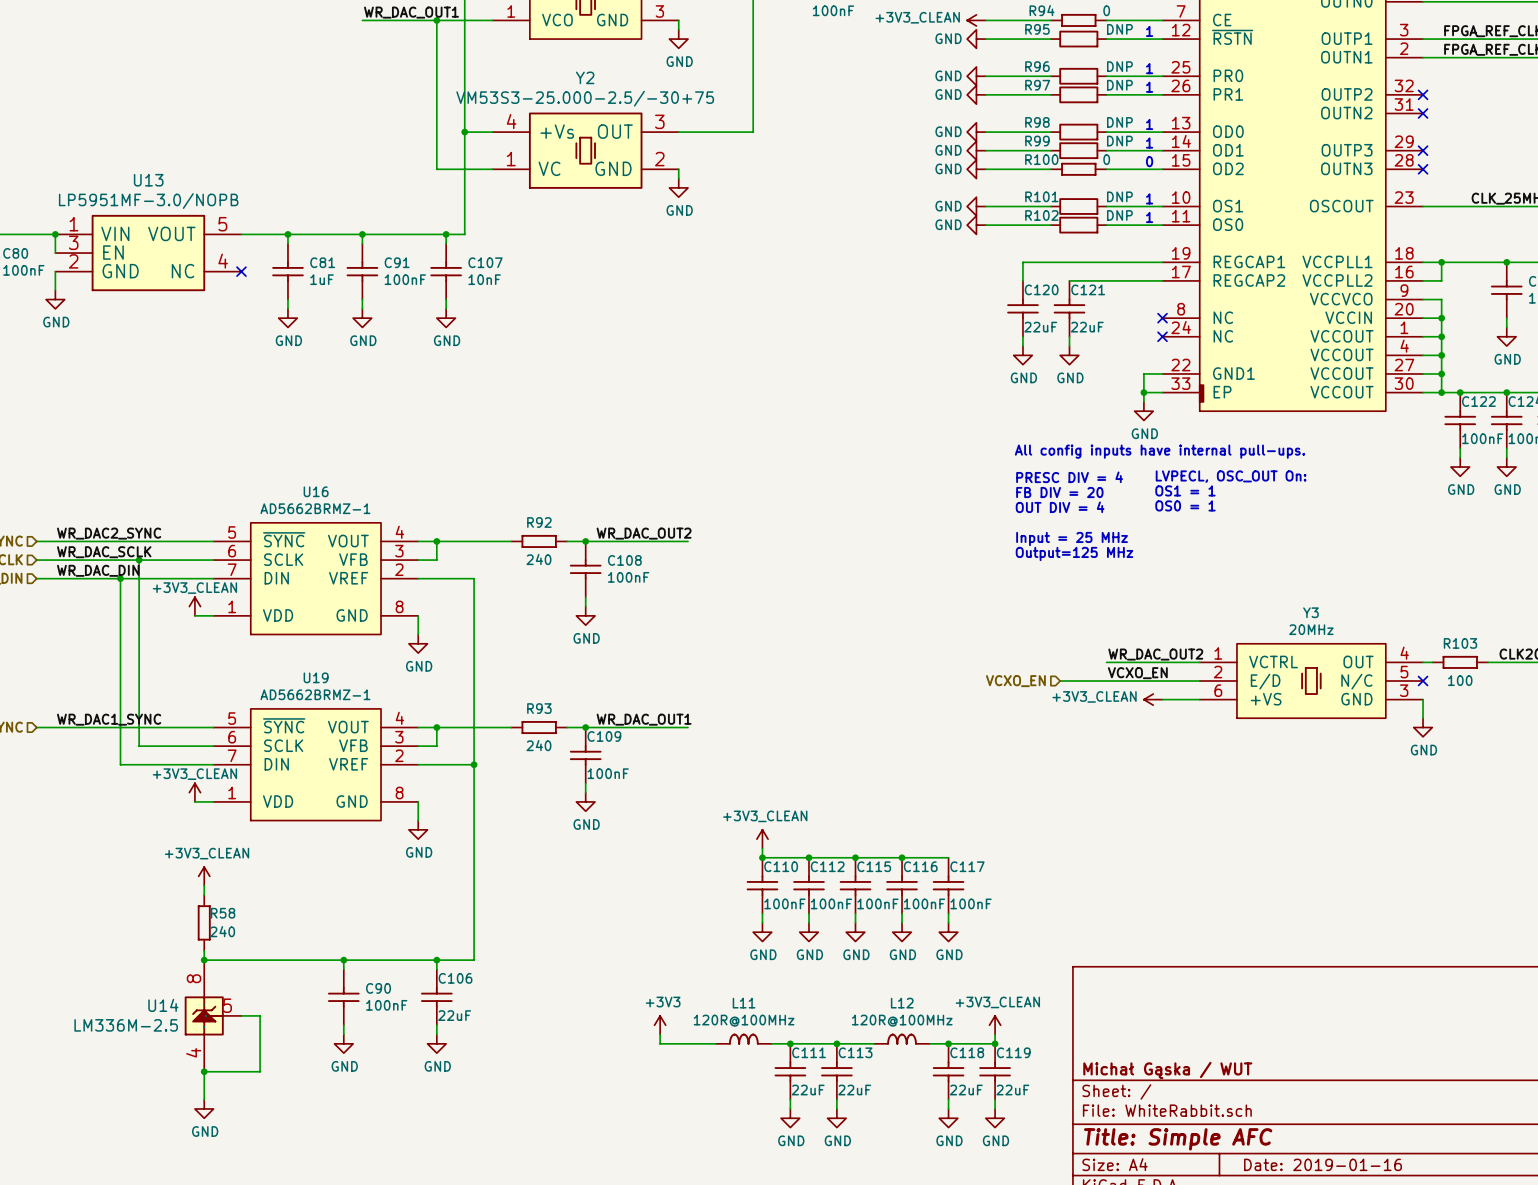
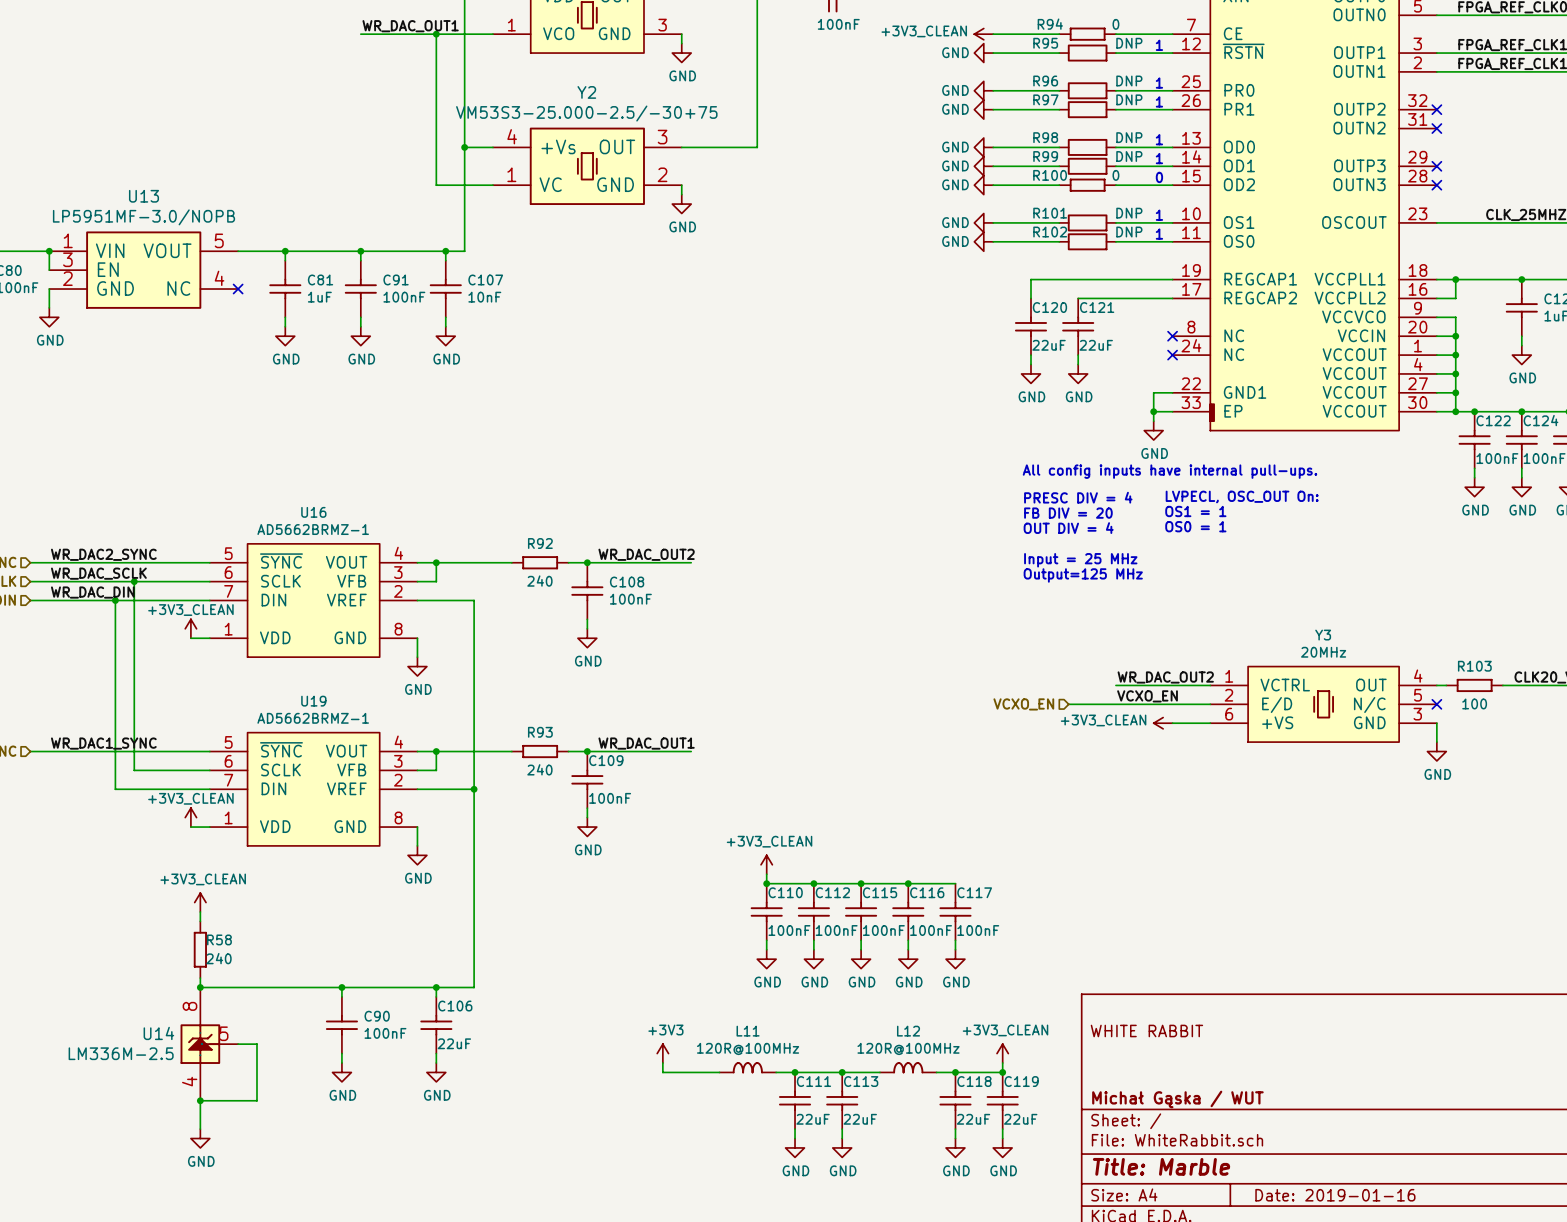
title block: none -> WHITE RABBIT (1146, 1030)
title block: Title: Simple AFC (1178, 1139) -> Title: Marble (1161, 1166)

